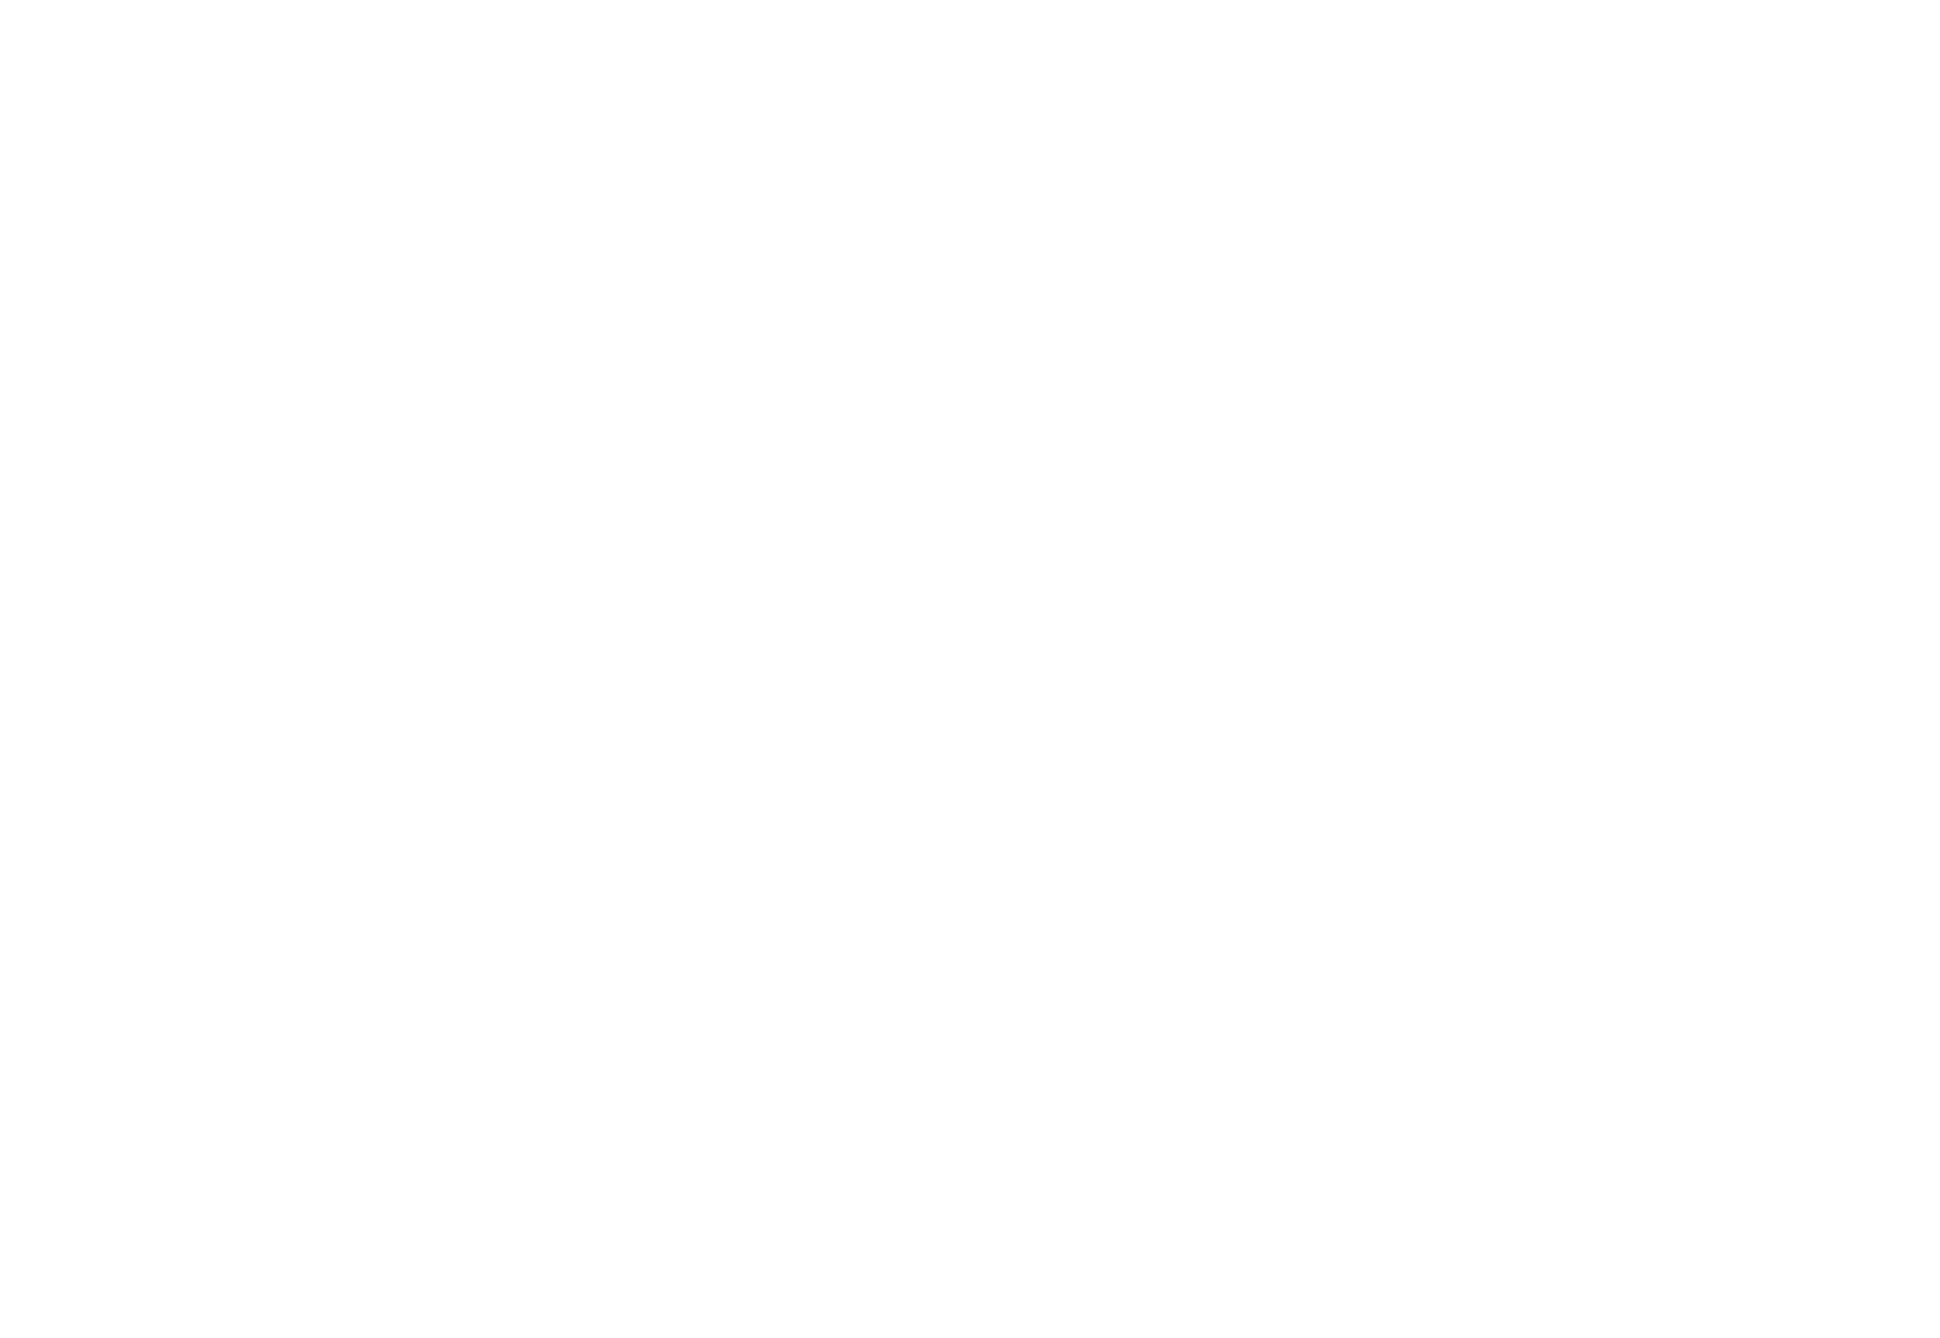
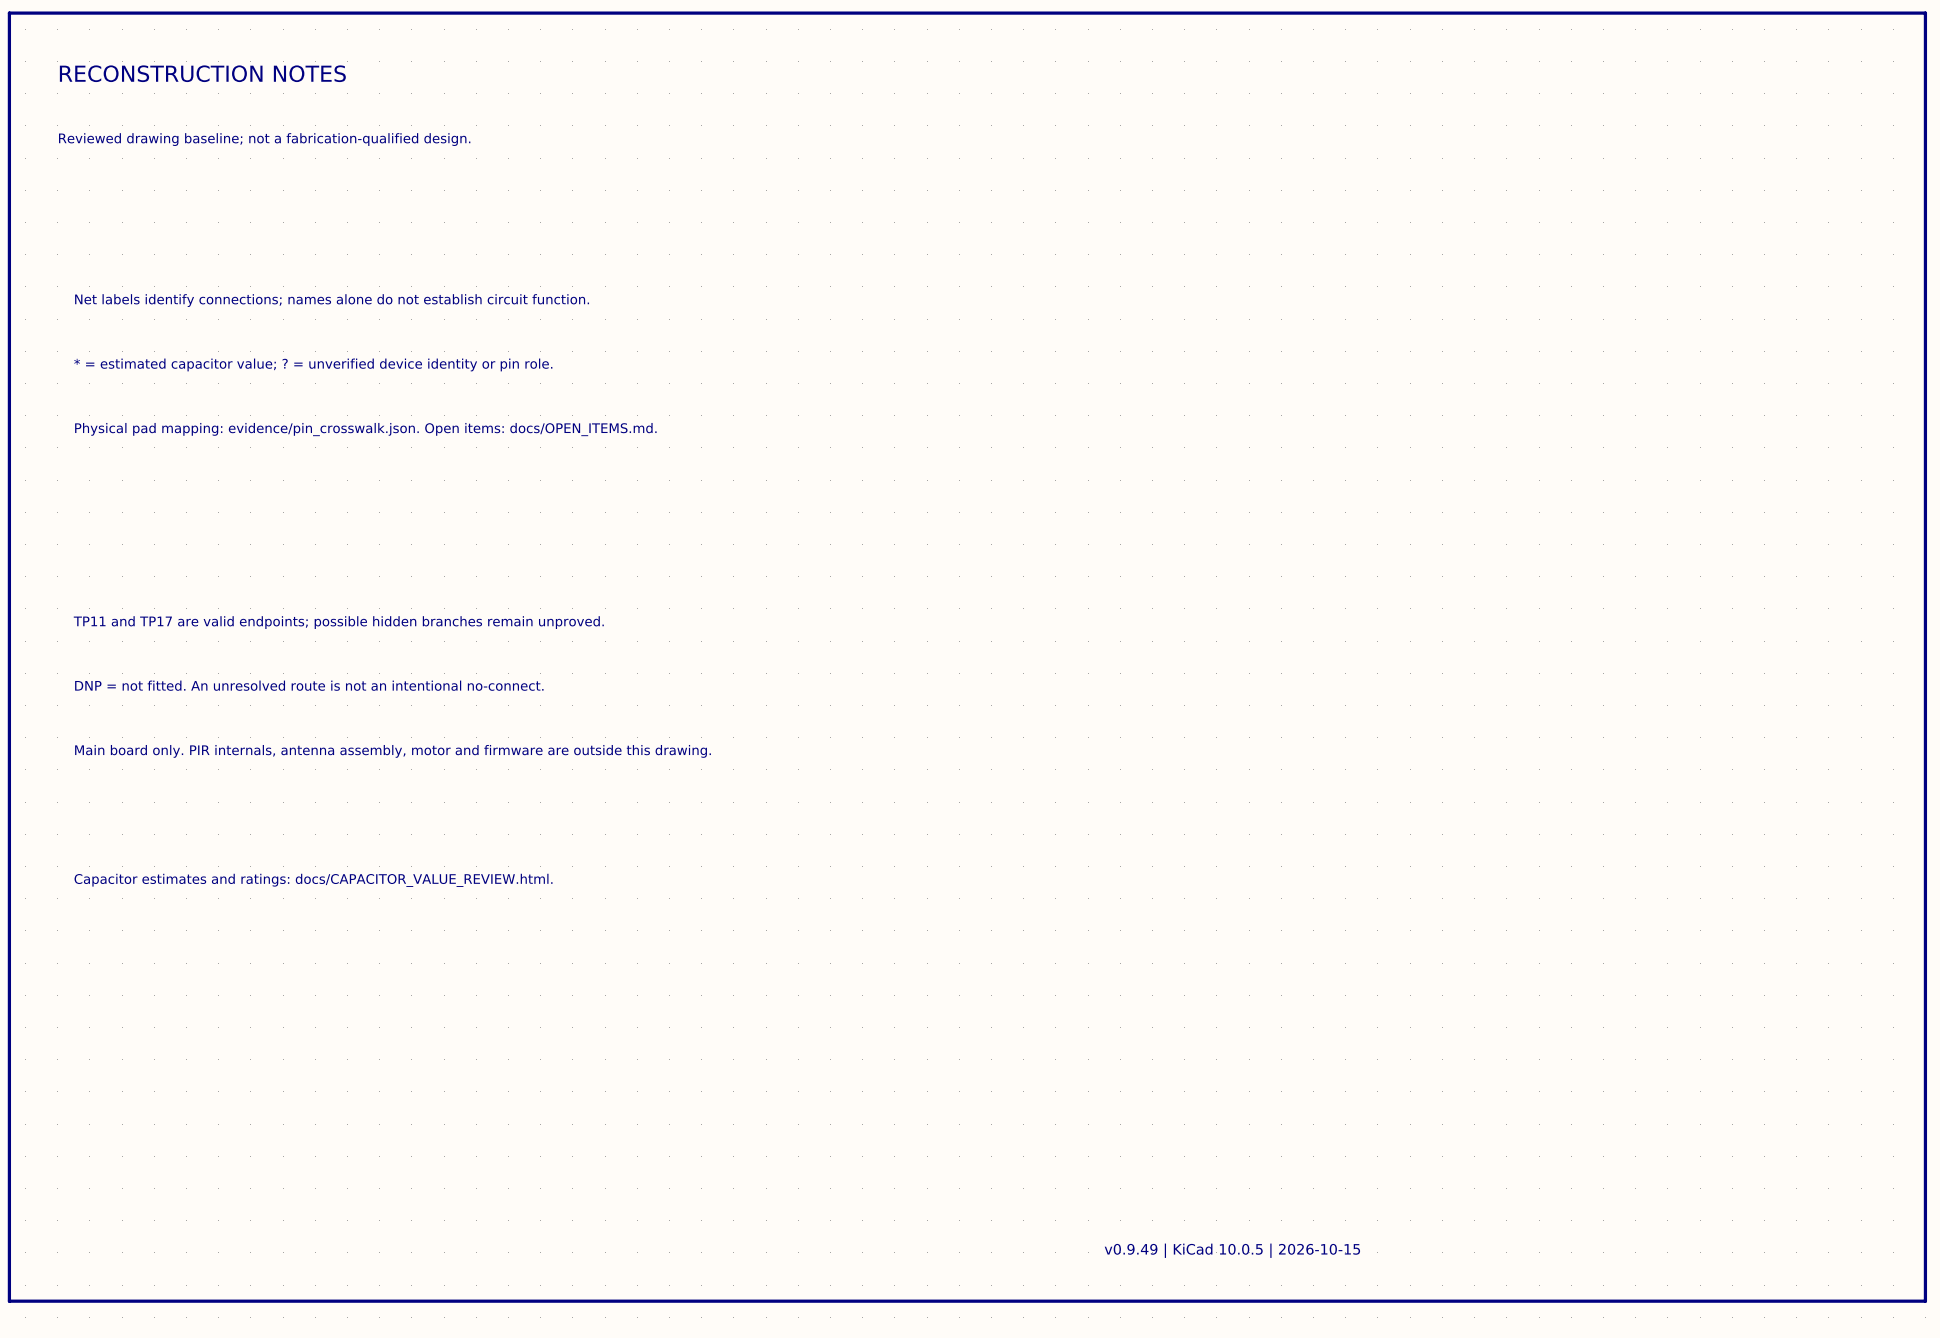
line: none -> (9, 13) (1925, 13) (1925, 1301) (9, 1301) (9, 13)
text: none -> RECONSTRUCTION NOTES (202, 73)
text: none -> Reviewed drawing baseline; not a fabrication-qualified design. (264, 139)
text: none -> Net labels identify connections; names alone do not establish circuit function. (332, 300)
text: none -> * = estimated capacitor value; ? = unverified device identity or pin role. (313, 364)
text: none -> Physical pad mapping: evidence/pin_crosswalk.json. Open items: docs/OPEN_ITEMS.md. (365, 429)
text: none -> TP11 and TP17 are valid endpoints; possible hidden branches remain unproved. (338, 622)
text: none -> DNP = not fitted. An unresolved route is not an intentional no-connect. (309, 685)
text: none -> Main board only. PIR internals, antenna assembly, motor and firmware are outside this drawing. (393, 751)
text: none -> Capacitor estimates and ratings: docs/CAPACITOR_VALUE_REVIEW.html. (313, 880)
text: none -> v0.9.49 | KiCad 10.0.5 | 2026-10-15 (1232, 1250)

